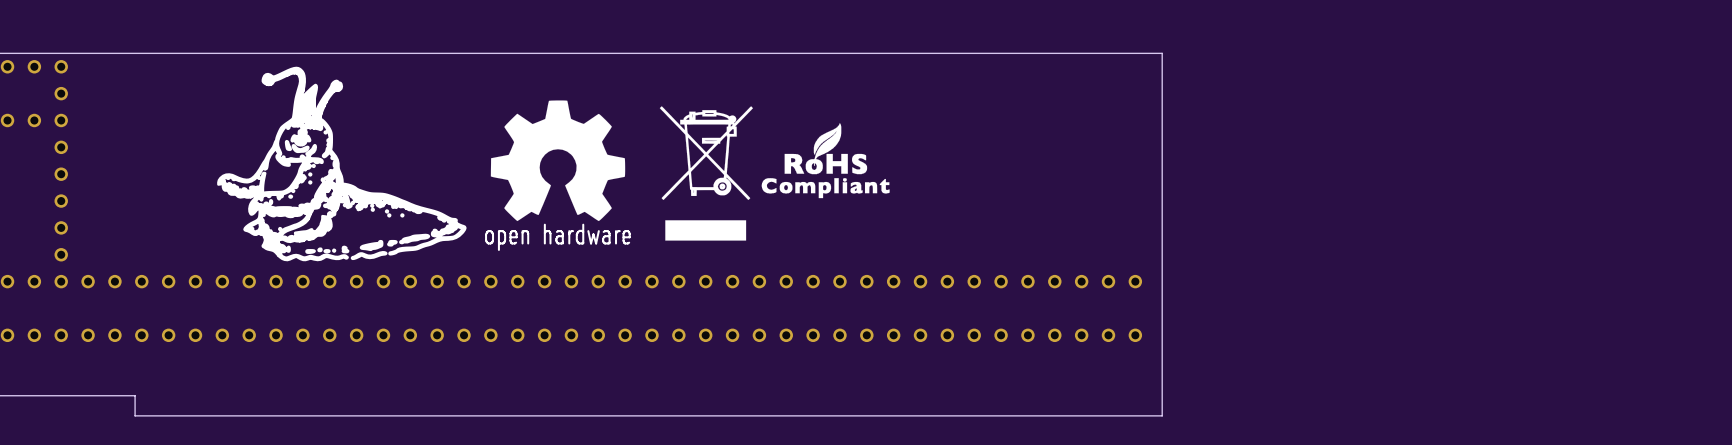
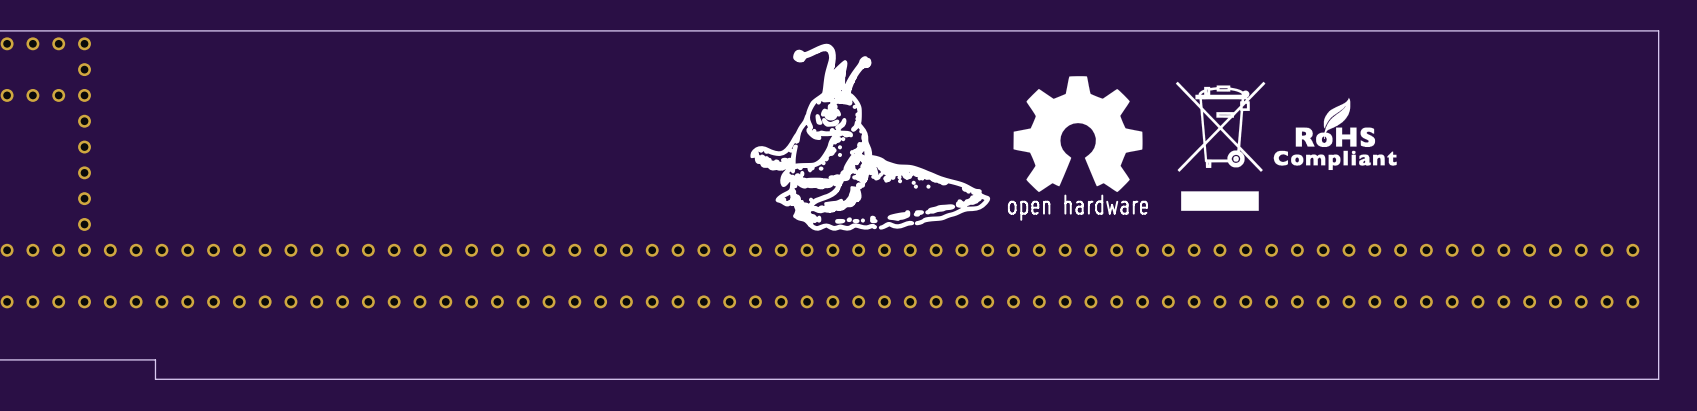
board edge: (1162, 53) (1162, 415) -> (1142, 30) (1658, 30) (1658, 379) (1142, 379)
drawing position: (825, 160) -> (1335, 133)
drawing position: (341, 164) -> (870, 137)
drawing position: (706, 173) -> (1220, 146)
drawing position: (557, 175) -> (1077, 148)
via: none -> (1142, 250)
via: none -> (1168, 250)
via: none -> (1194, 250)
via: none -> (1219, 250)
via: none -> (1245, 250)
via: none -> (1271, 250)
via: none -> (1297, 250)
via: none -> (1323, 250)
via: none -> (1348, 250)
via: none -> (1374, 250)
via: none -> (1400, 250)
via: none -> (1426, 250)
via: none -> (1452, 250)
via: none -> (1478, 250)
via: none -> (1503, 250)
via: none -> (1529, 250)
via: none -> (1555, 250)
via: none -> (1581, 250)
via: none -> (1607, 250)
via: none -> (1632, 250)
via: none -> (1142, 301)
via: none -> (1168, 301)
via: none -> (1194, 301)
via: none -> (1219, 301)
via: none -> (1245, 301)
via: none -> (1271, 301)
via: none -> (1297, 301)
via: none -> (1323, 301)
via: none -> (1348, 301)
via: none -> (1374, 301)
via: none -> (1400, 301)
via: none -> (1426, 301)
via: none -> (1452, 301)
via: none -> (1478, 301)
via: none -> (1503, 301)
via: none -> (1529, 301)
via: none -> (1555, 301)
via: none -> (1581, 301)
via: none -> (1607, 301)
via: none -> (1632, 301)

